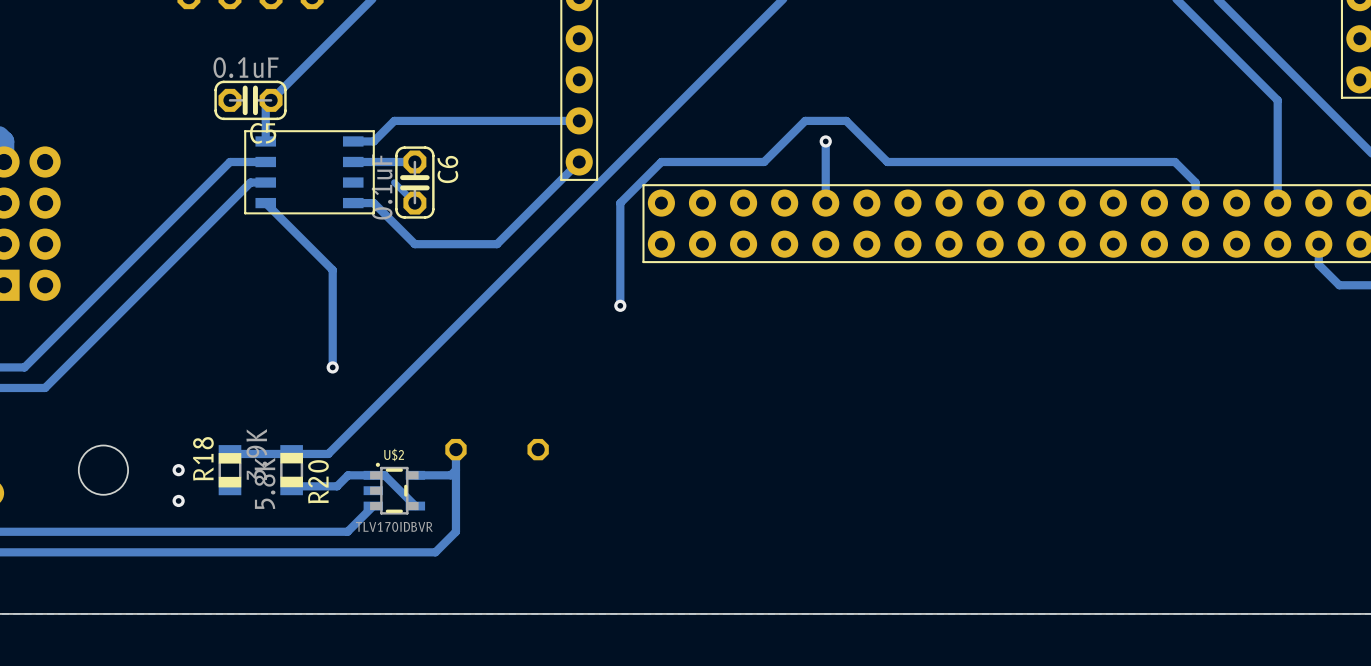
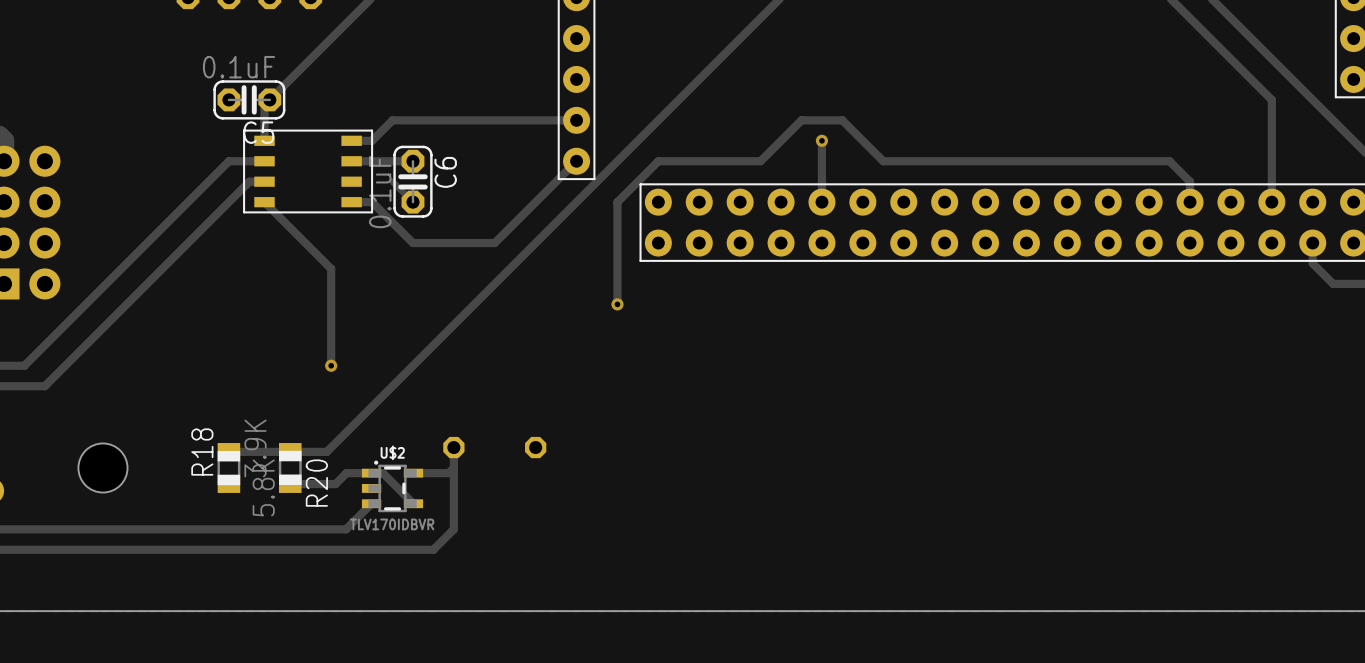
via: (178, 470) -> none
via: (178, 500) -> none

